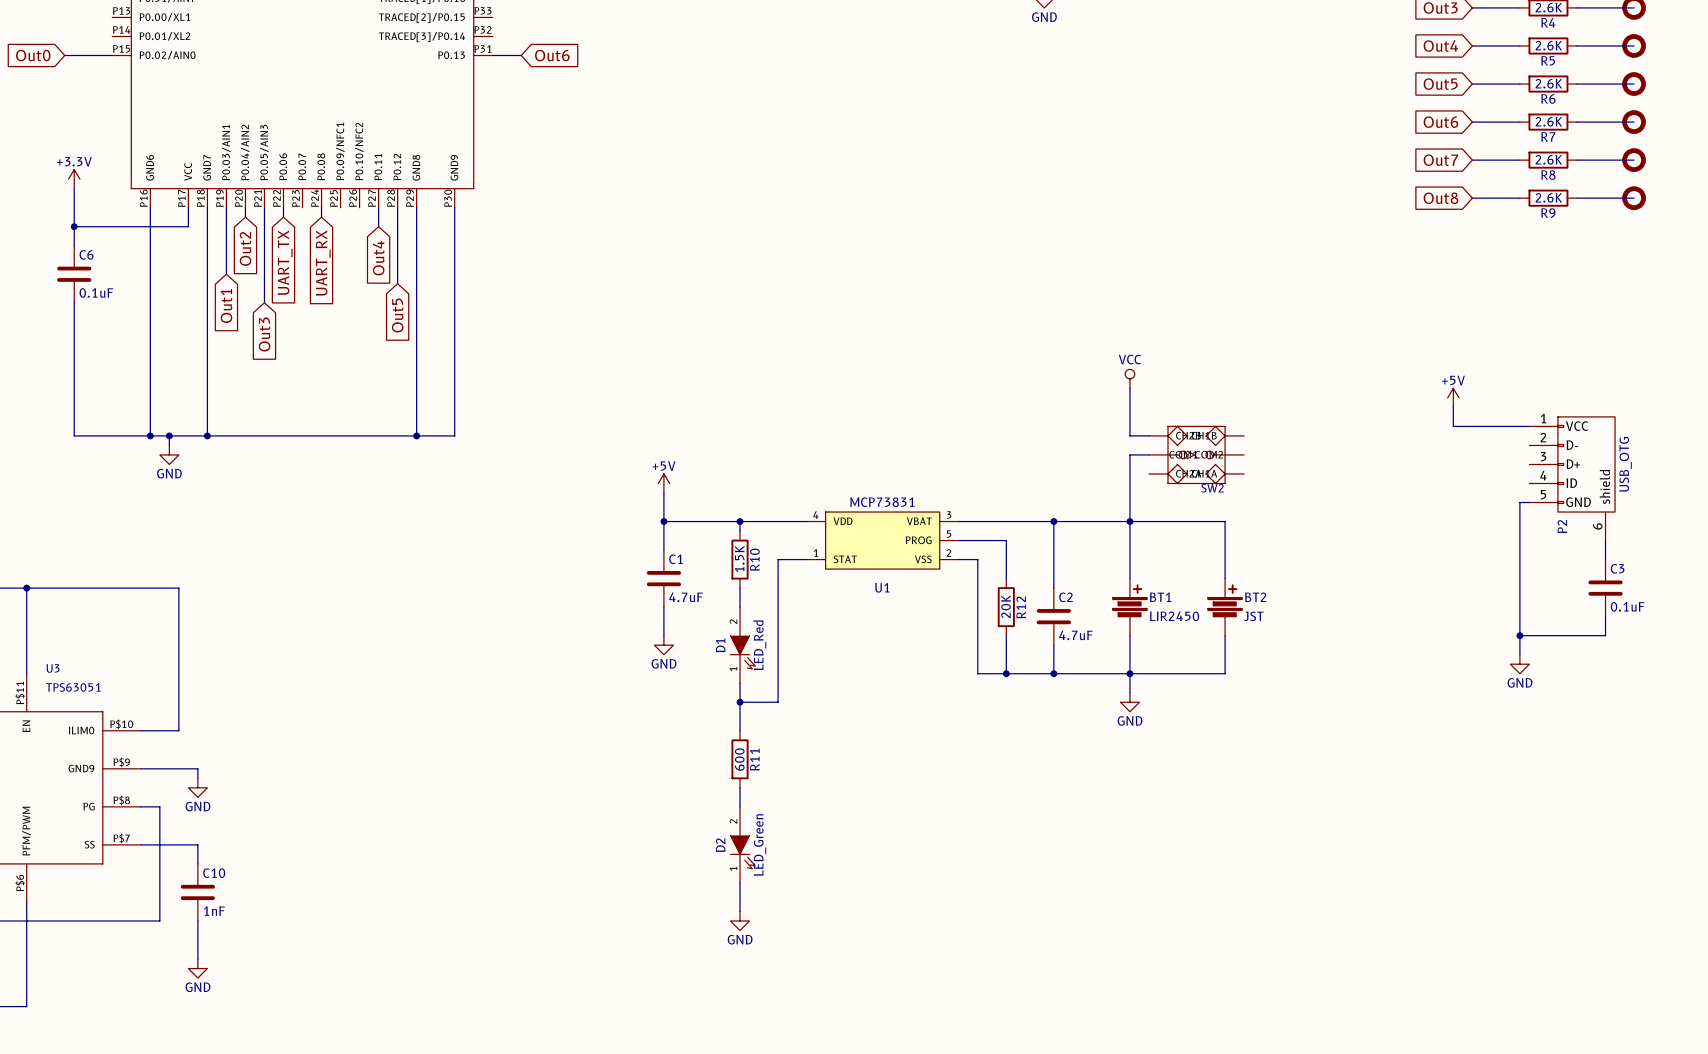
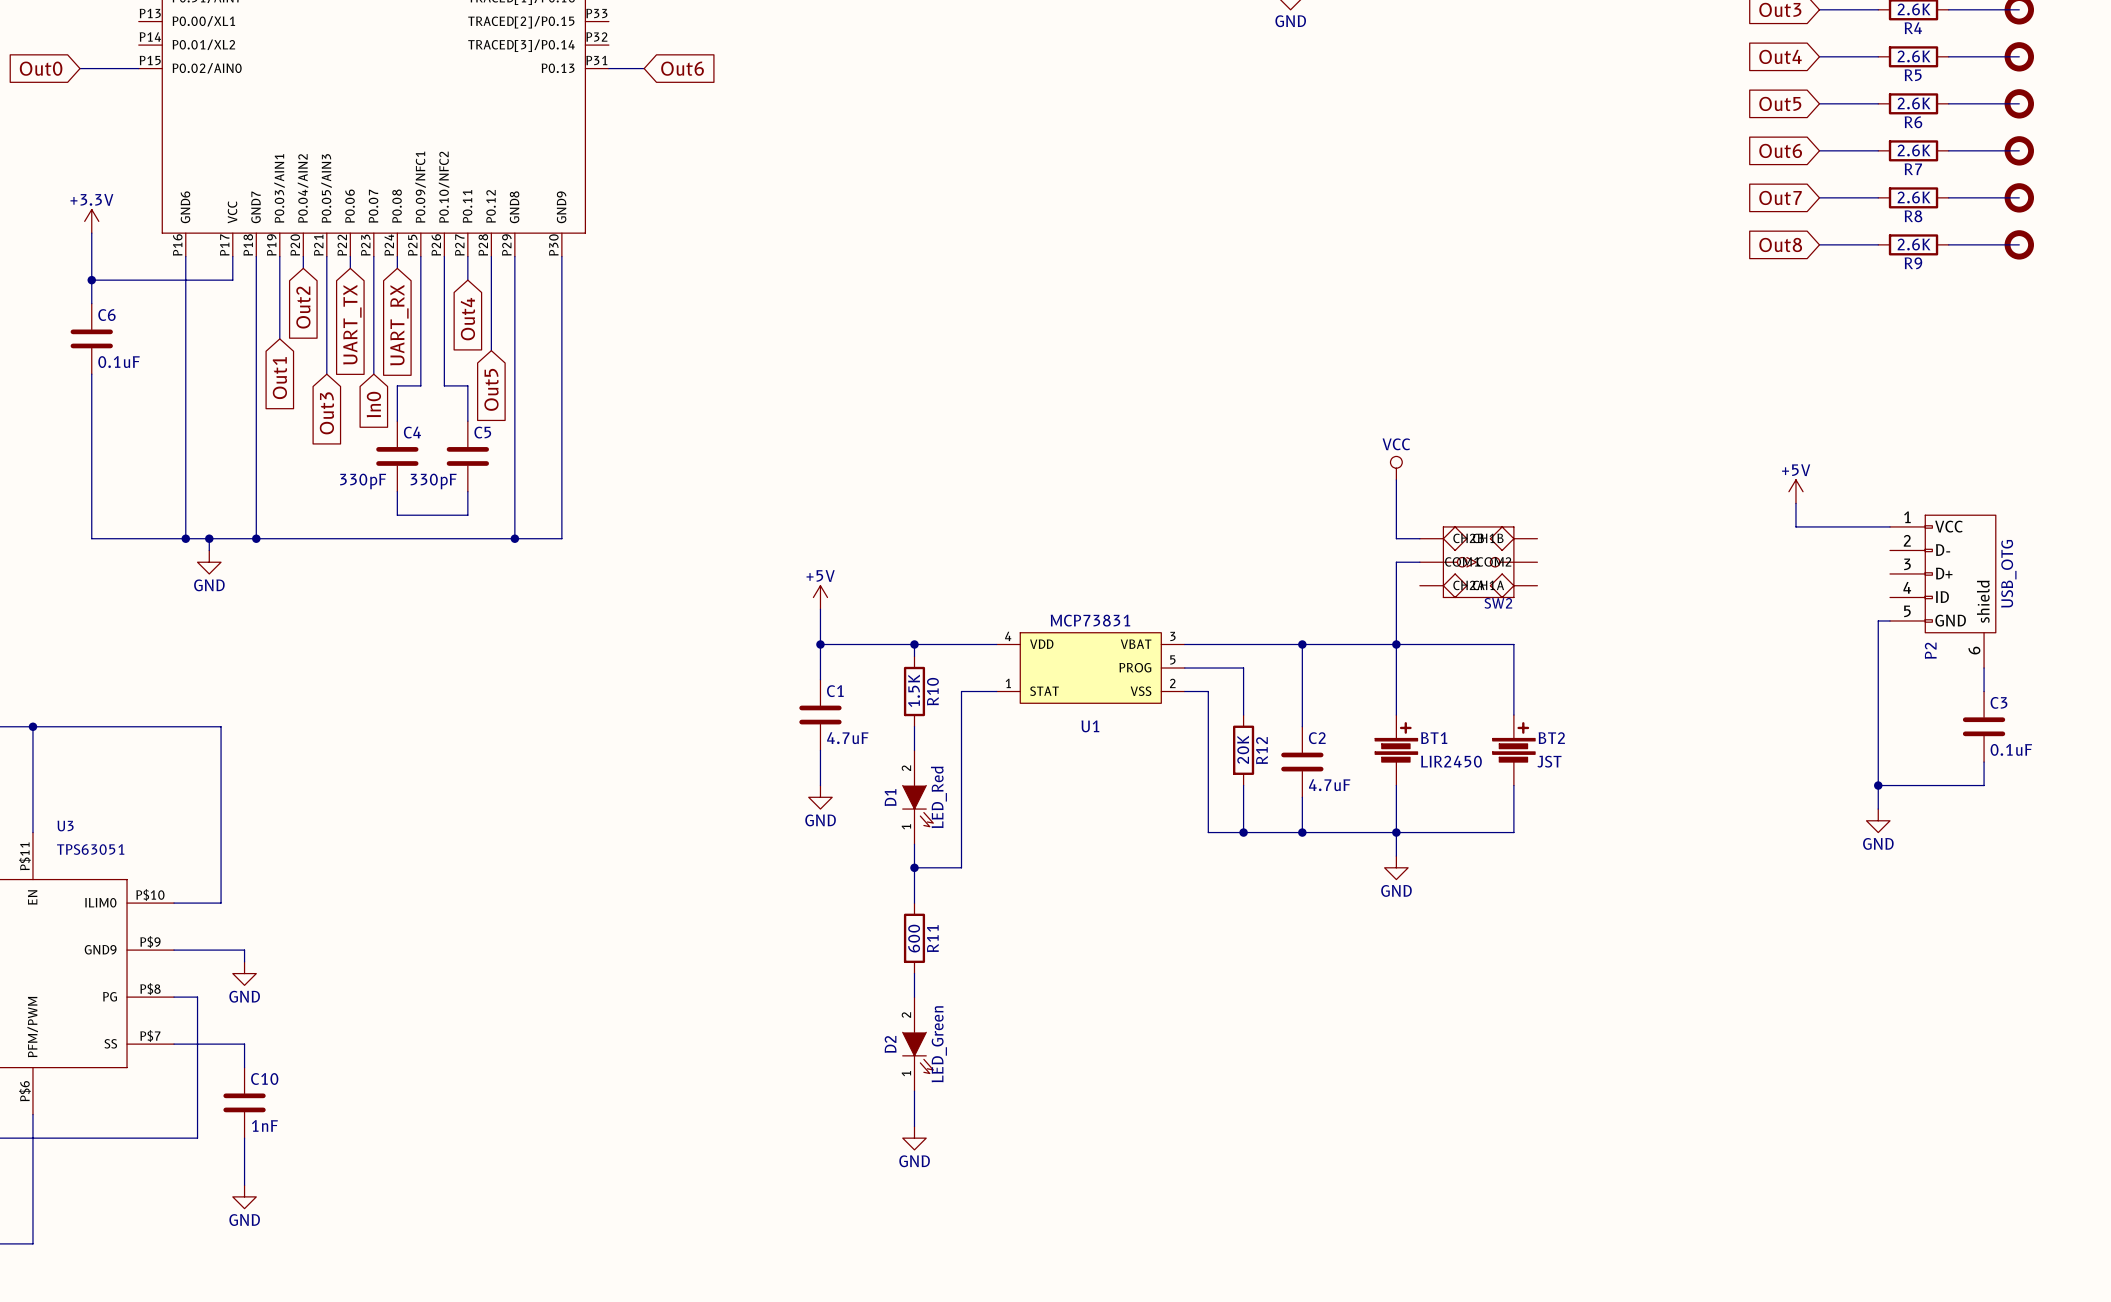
wire: none -> (373, 256) (373, 374)
wire: none -> (420, 256) (420, 385) (397, 385) (397, 421)
wire: none -> (444, 256) (444, 385) (467, 385) (467, 421)
global label: none -> In0 (373, 404)
C4: none -> 330pF (397, 456)
C5: none -> 330pF (467, 456)
wire: none -> (397, 491) (397, 515) (467, 515) (467, 491)

